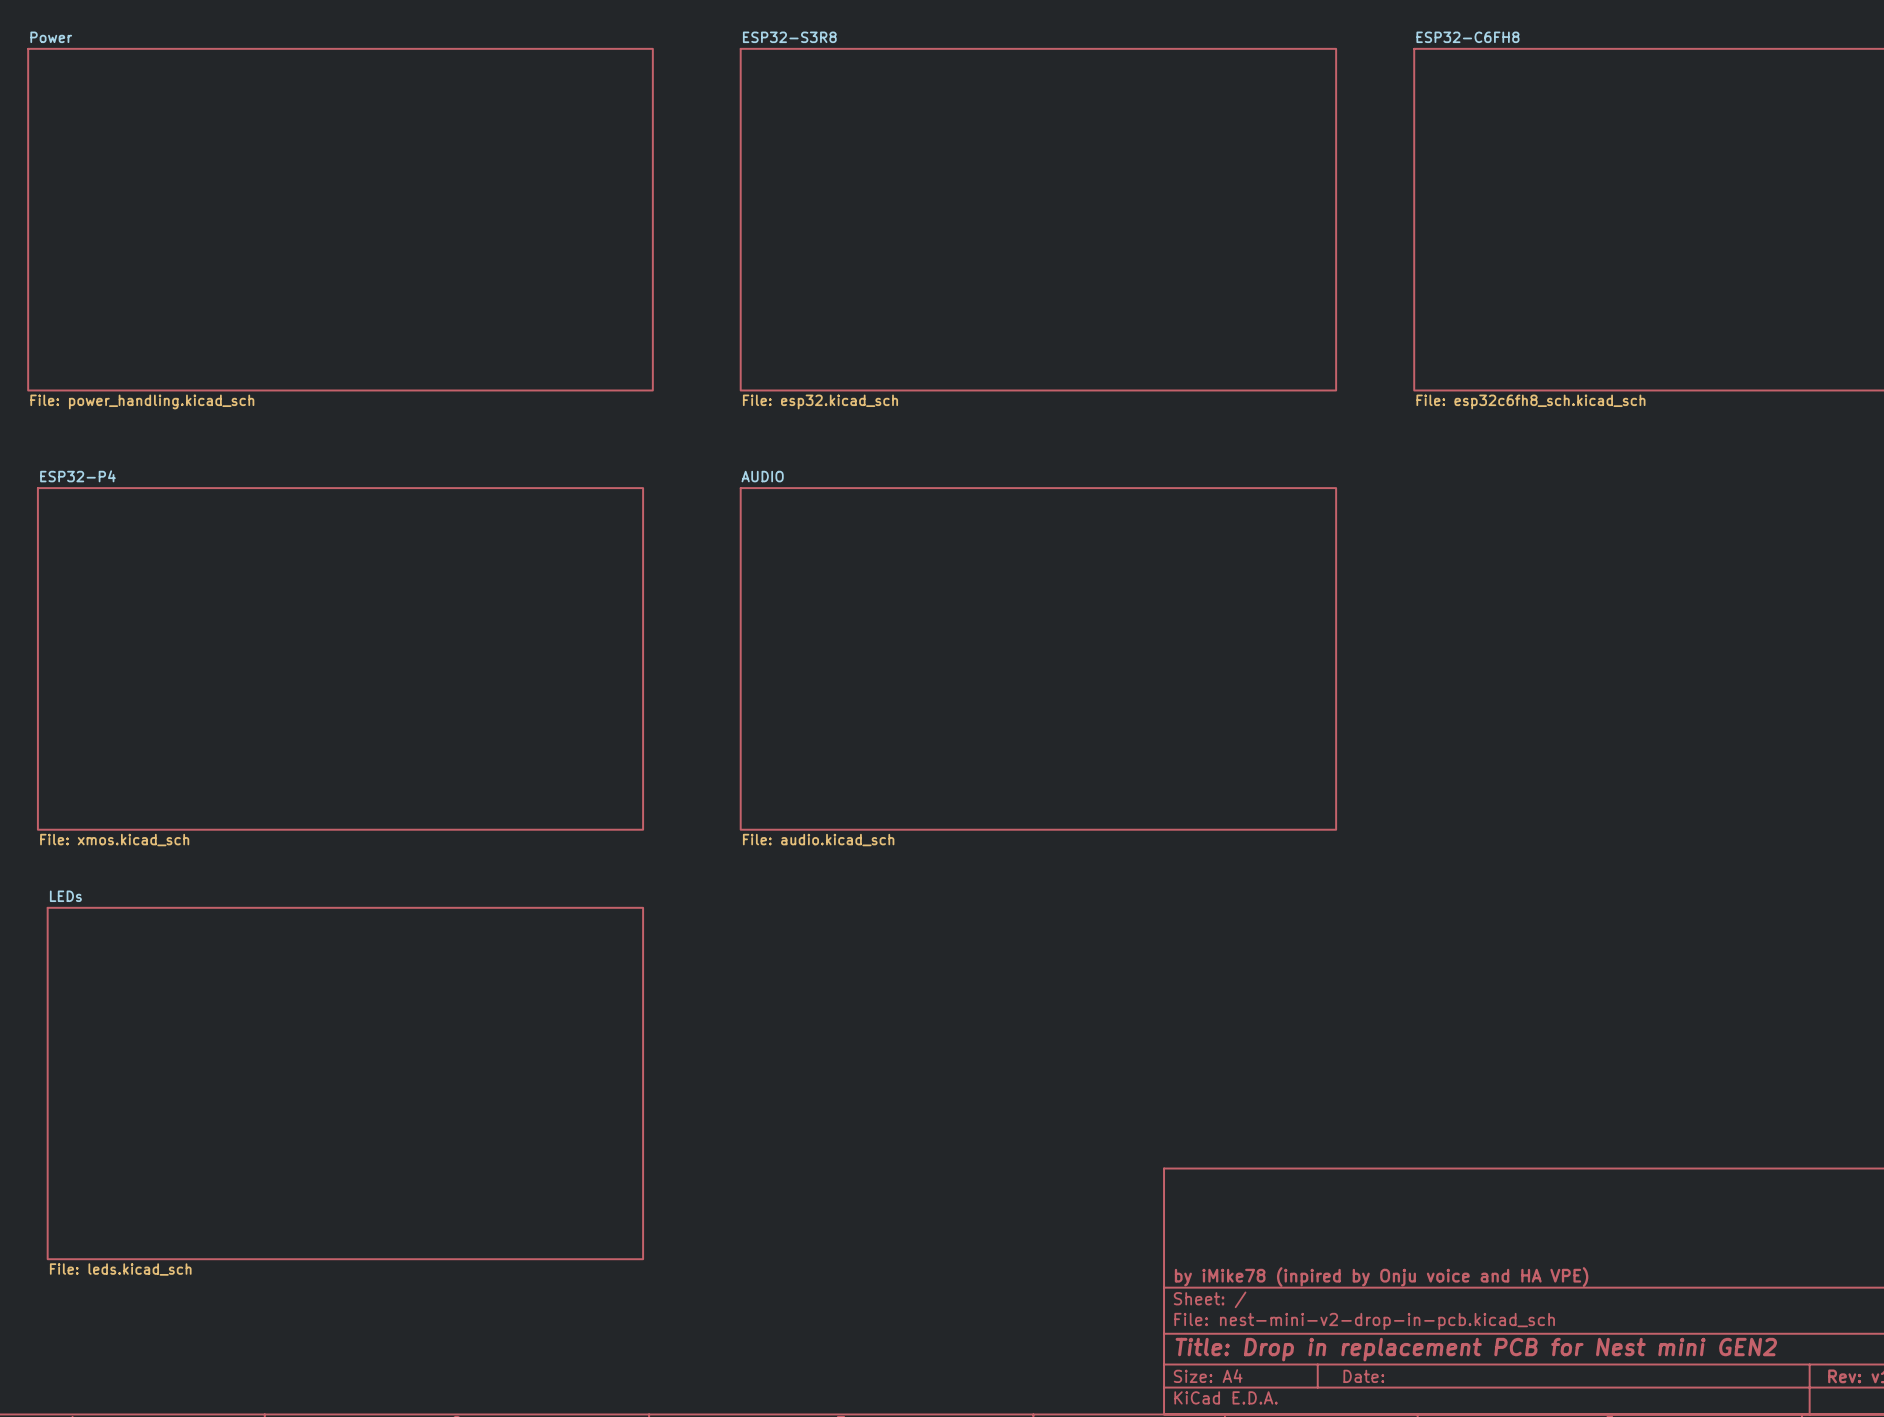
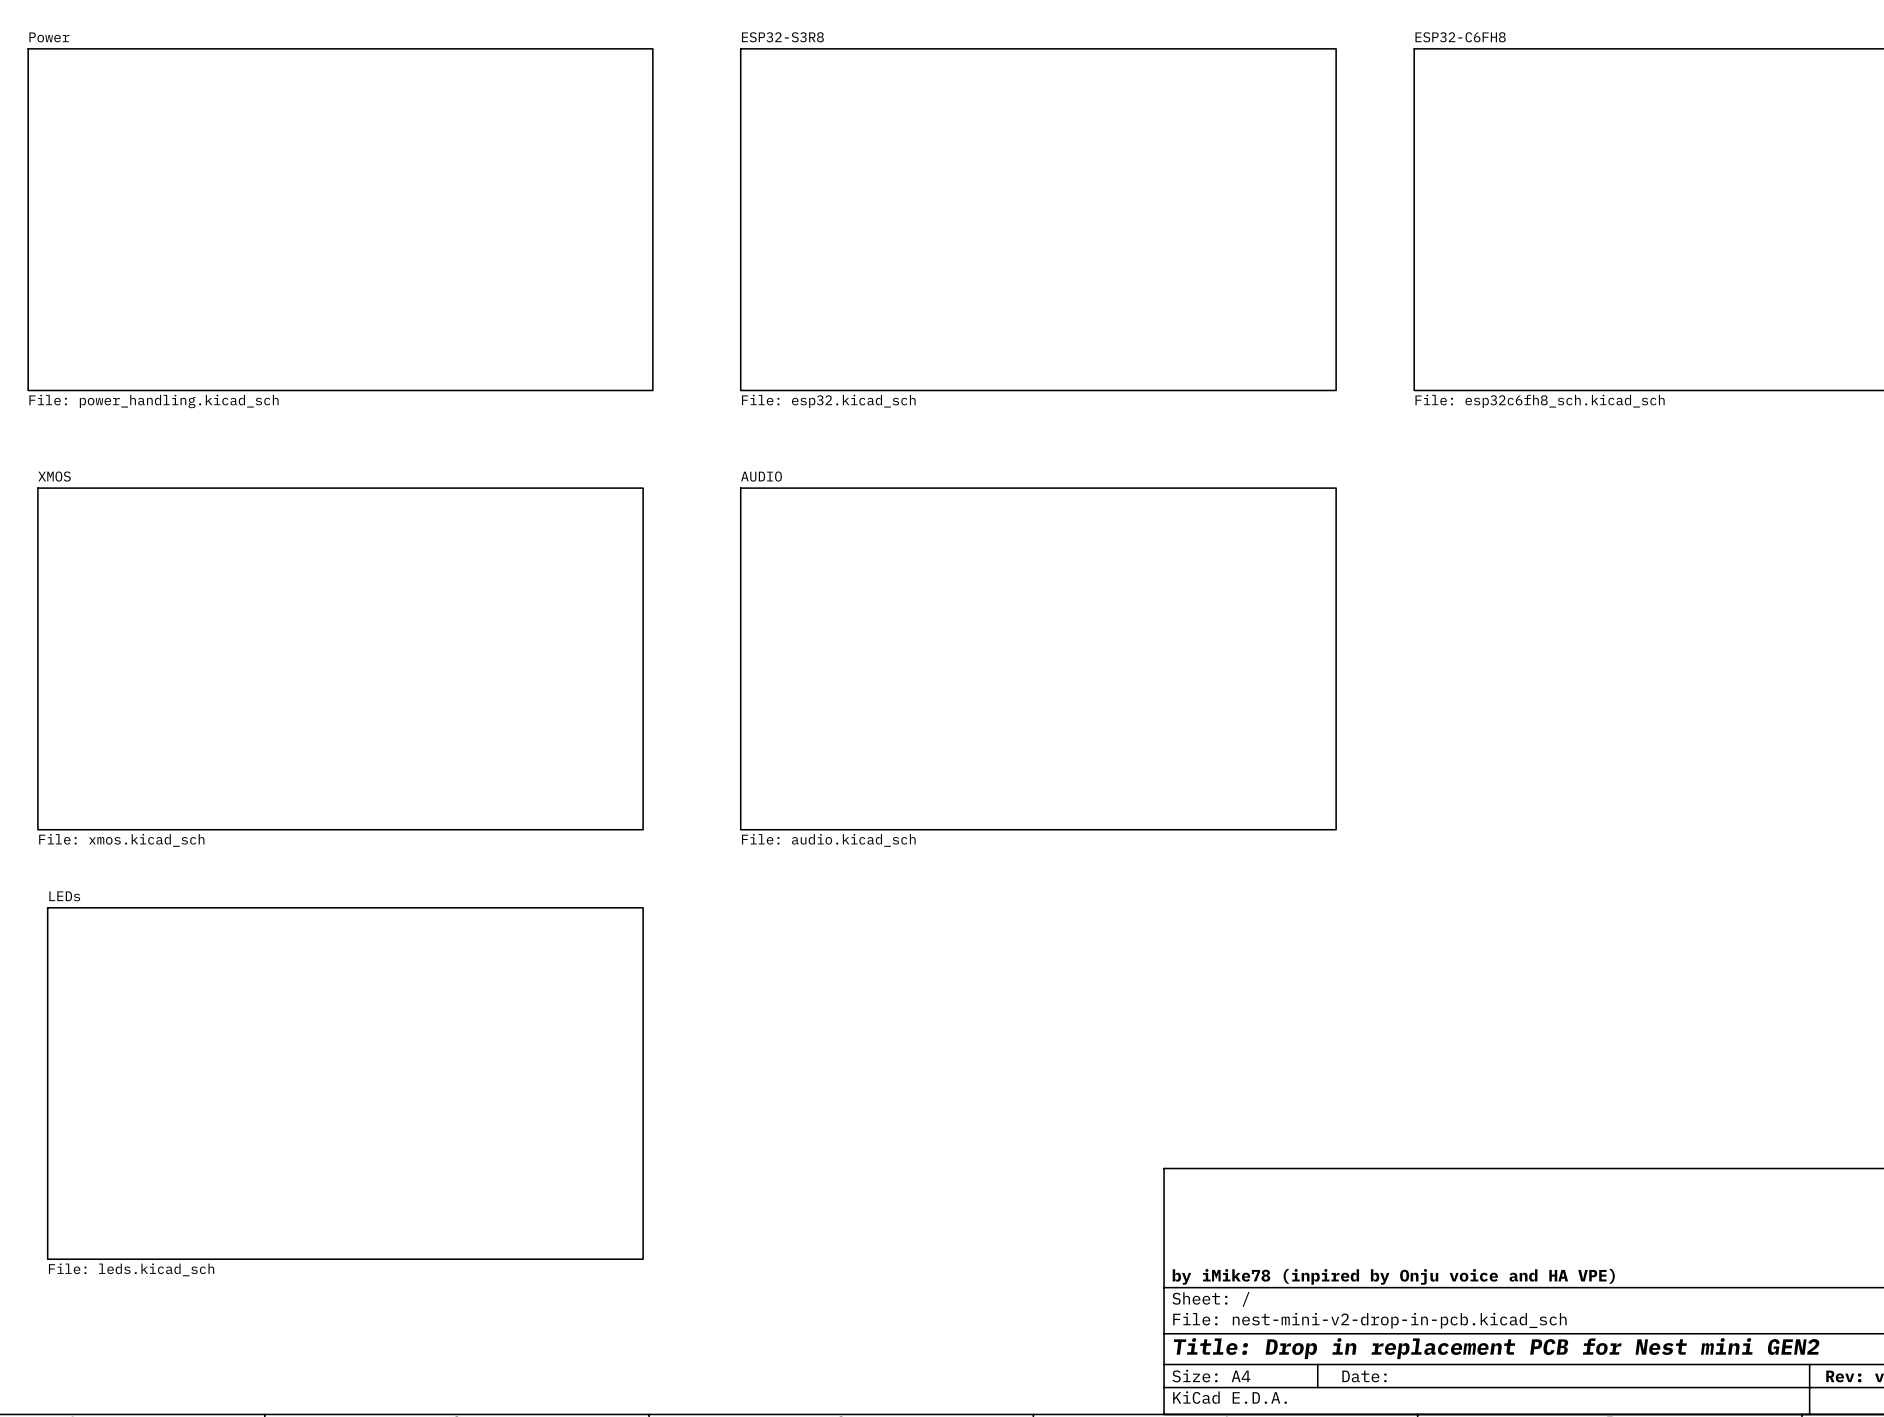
sheet ESP32-P4 name: ESP32-P4 (77, 476) -> XMOS (54, 476)

